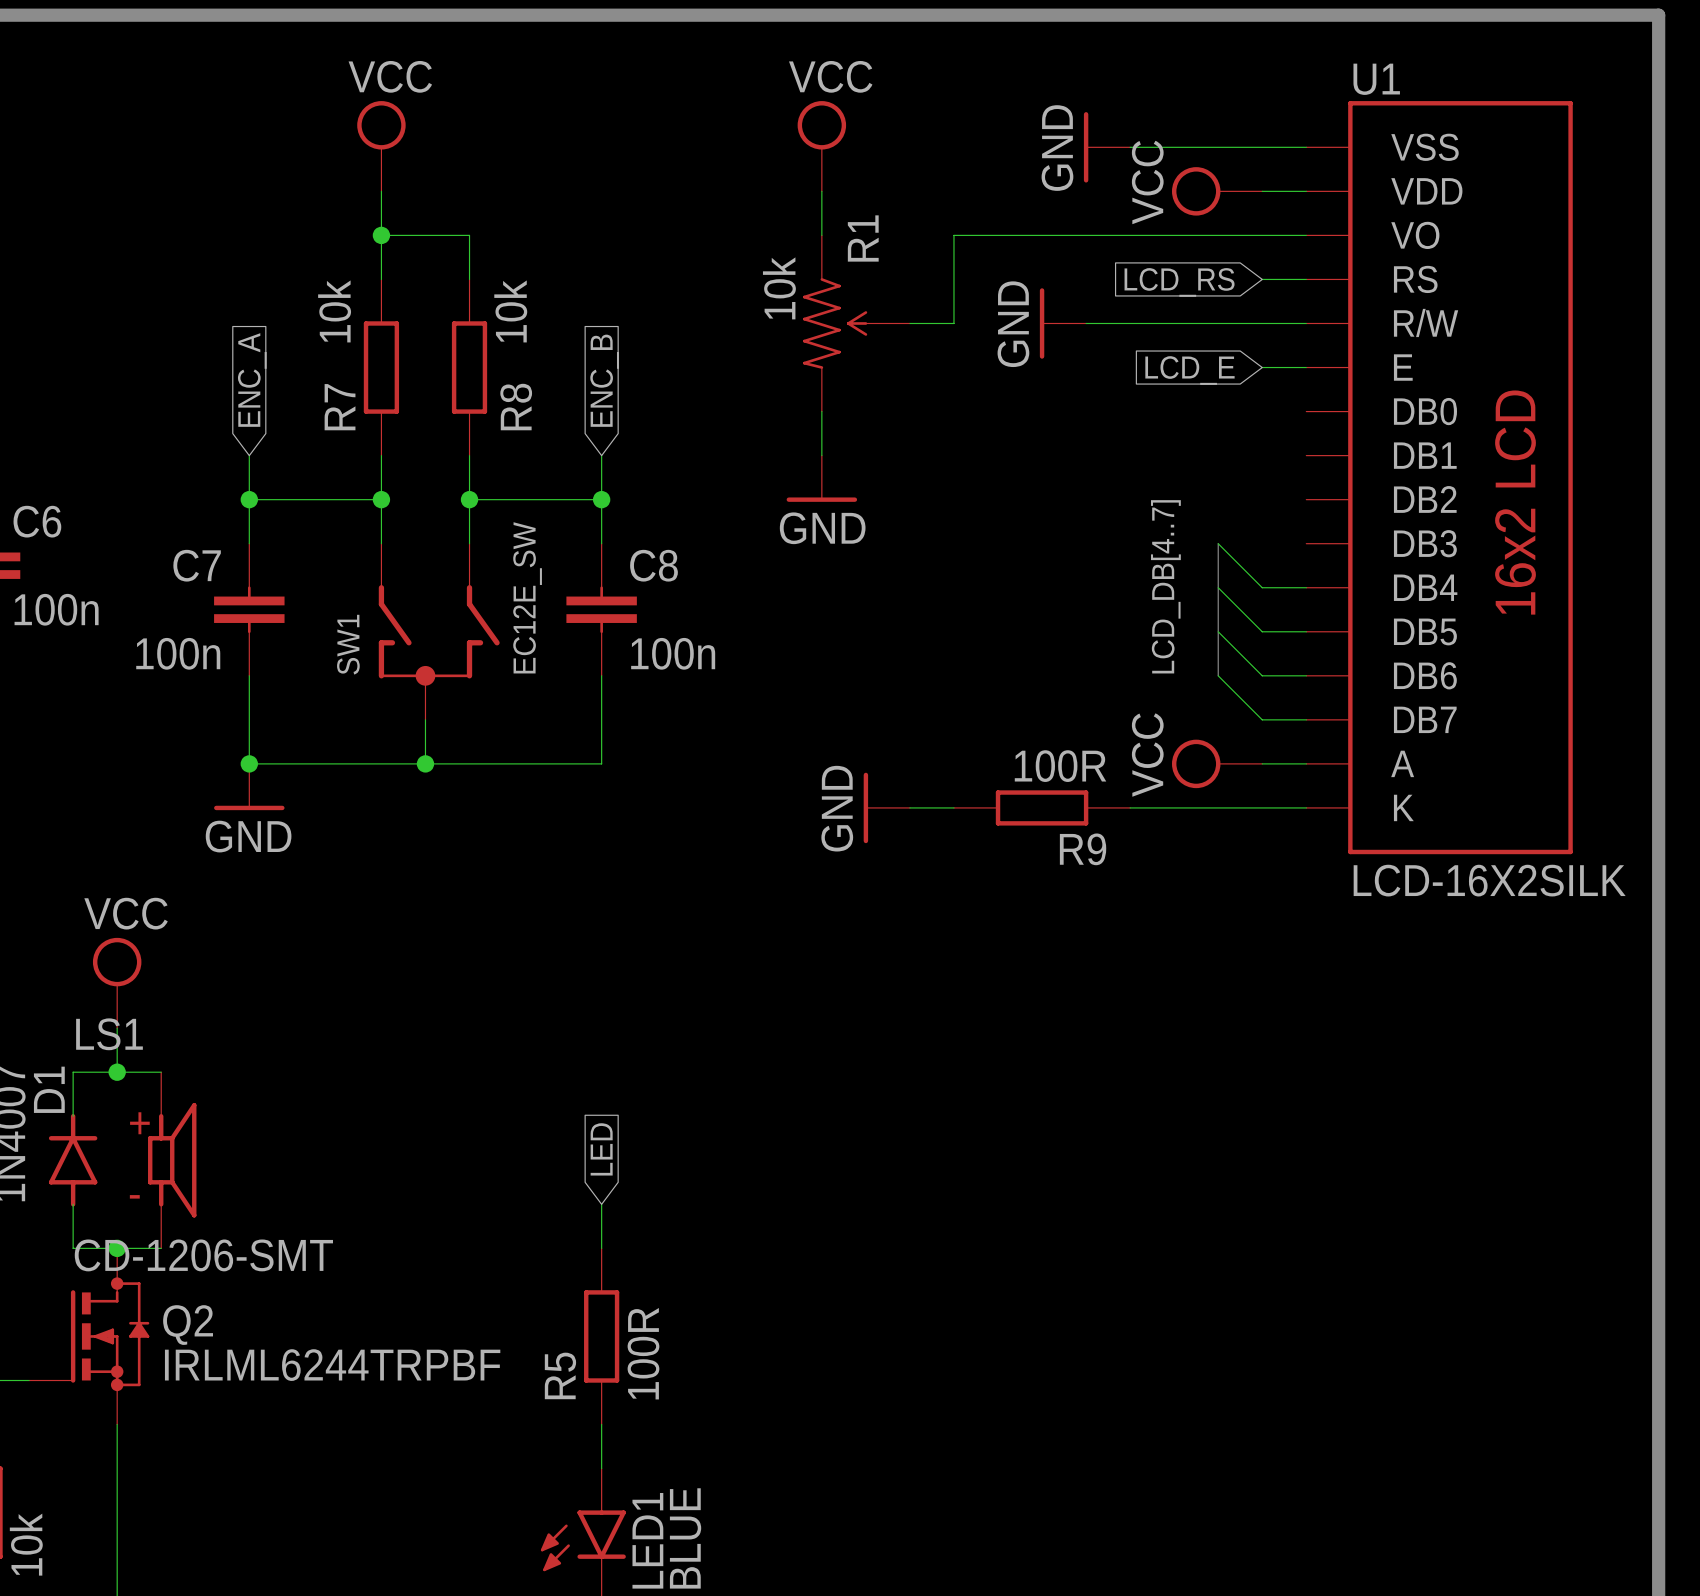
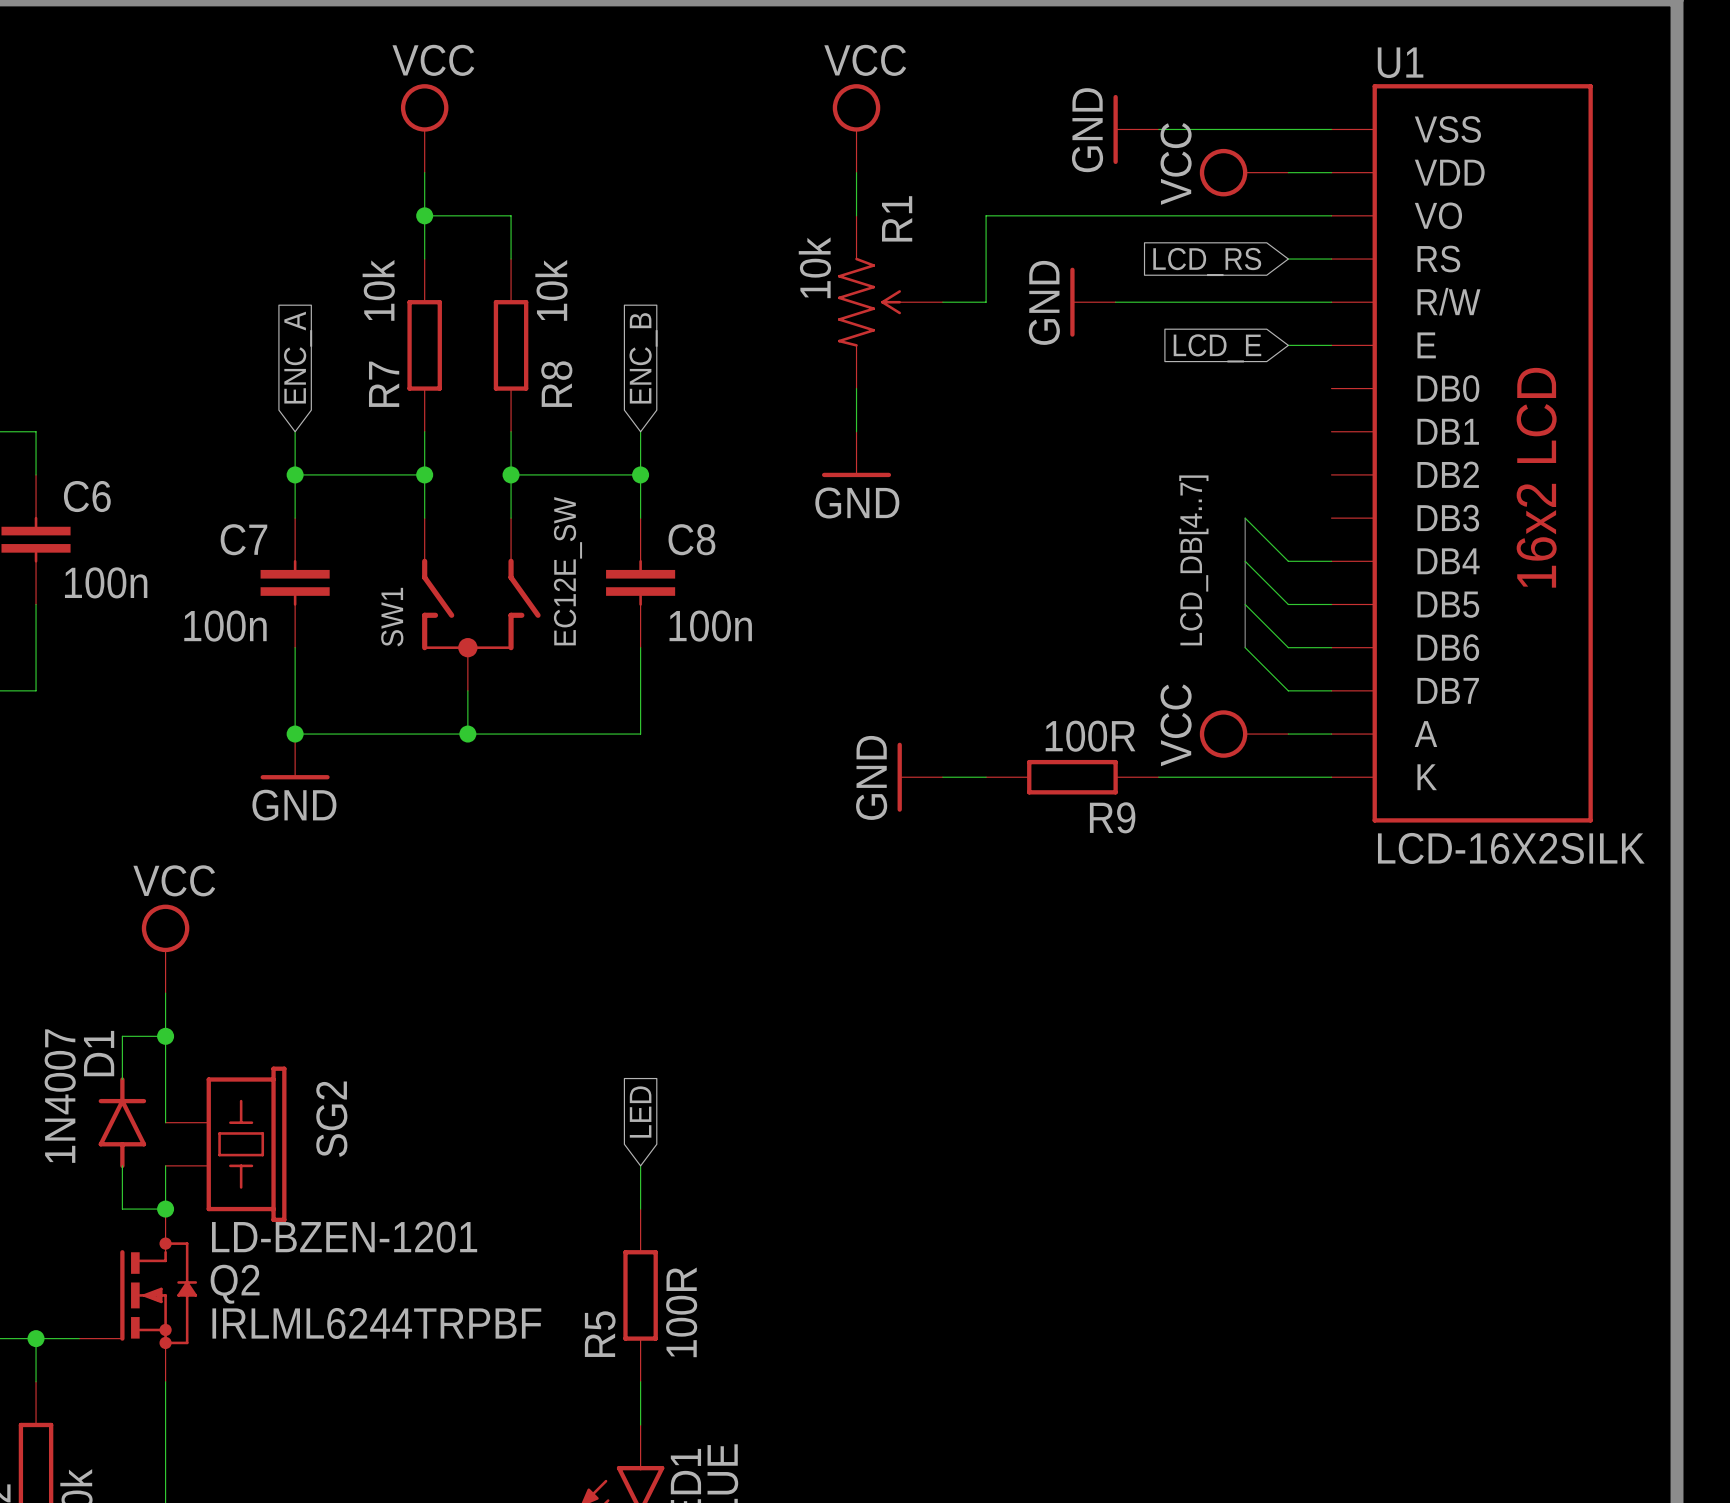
wire: (117, 1072) (161, 1072) -> (165, 1036) (165, 1122)
LS1: CD-1206-SMT (172, 1160) -> none
SG2: none -> LD-BZEN-1201 (226, 1144)
wire: (117, 1248) (161, 1248) -> (165, 1209) (165, 1165)

